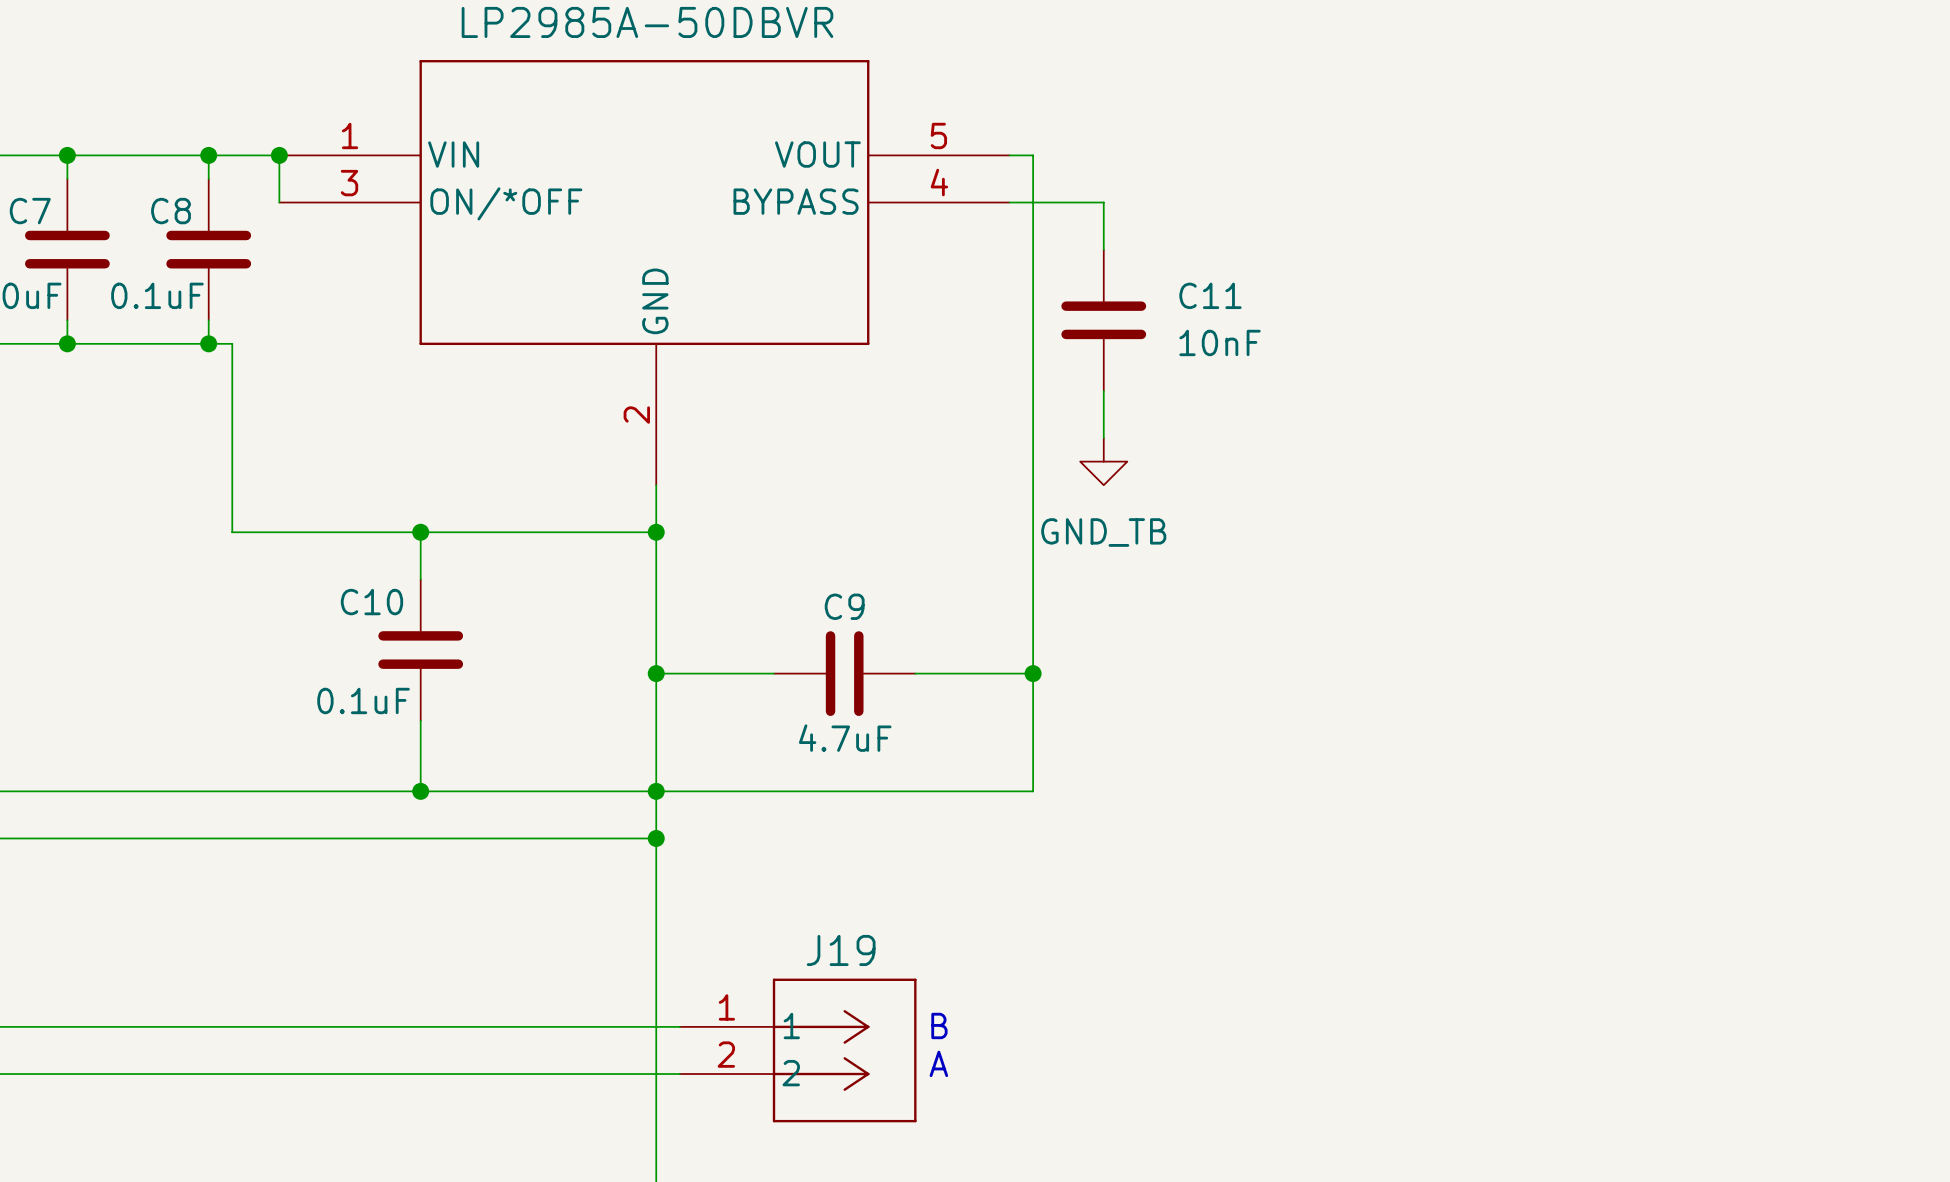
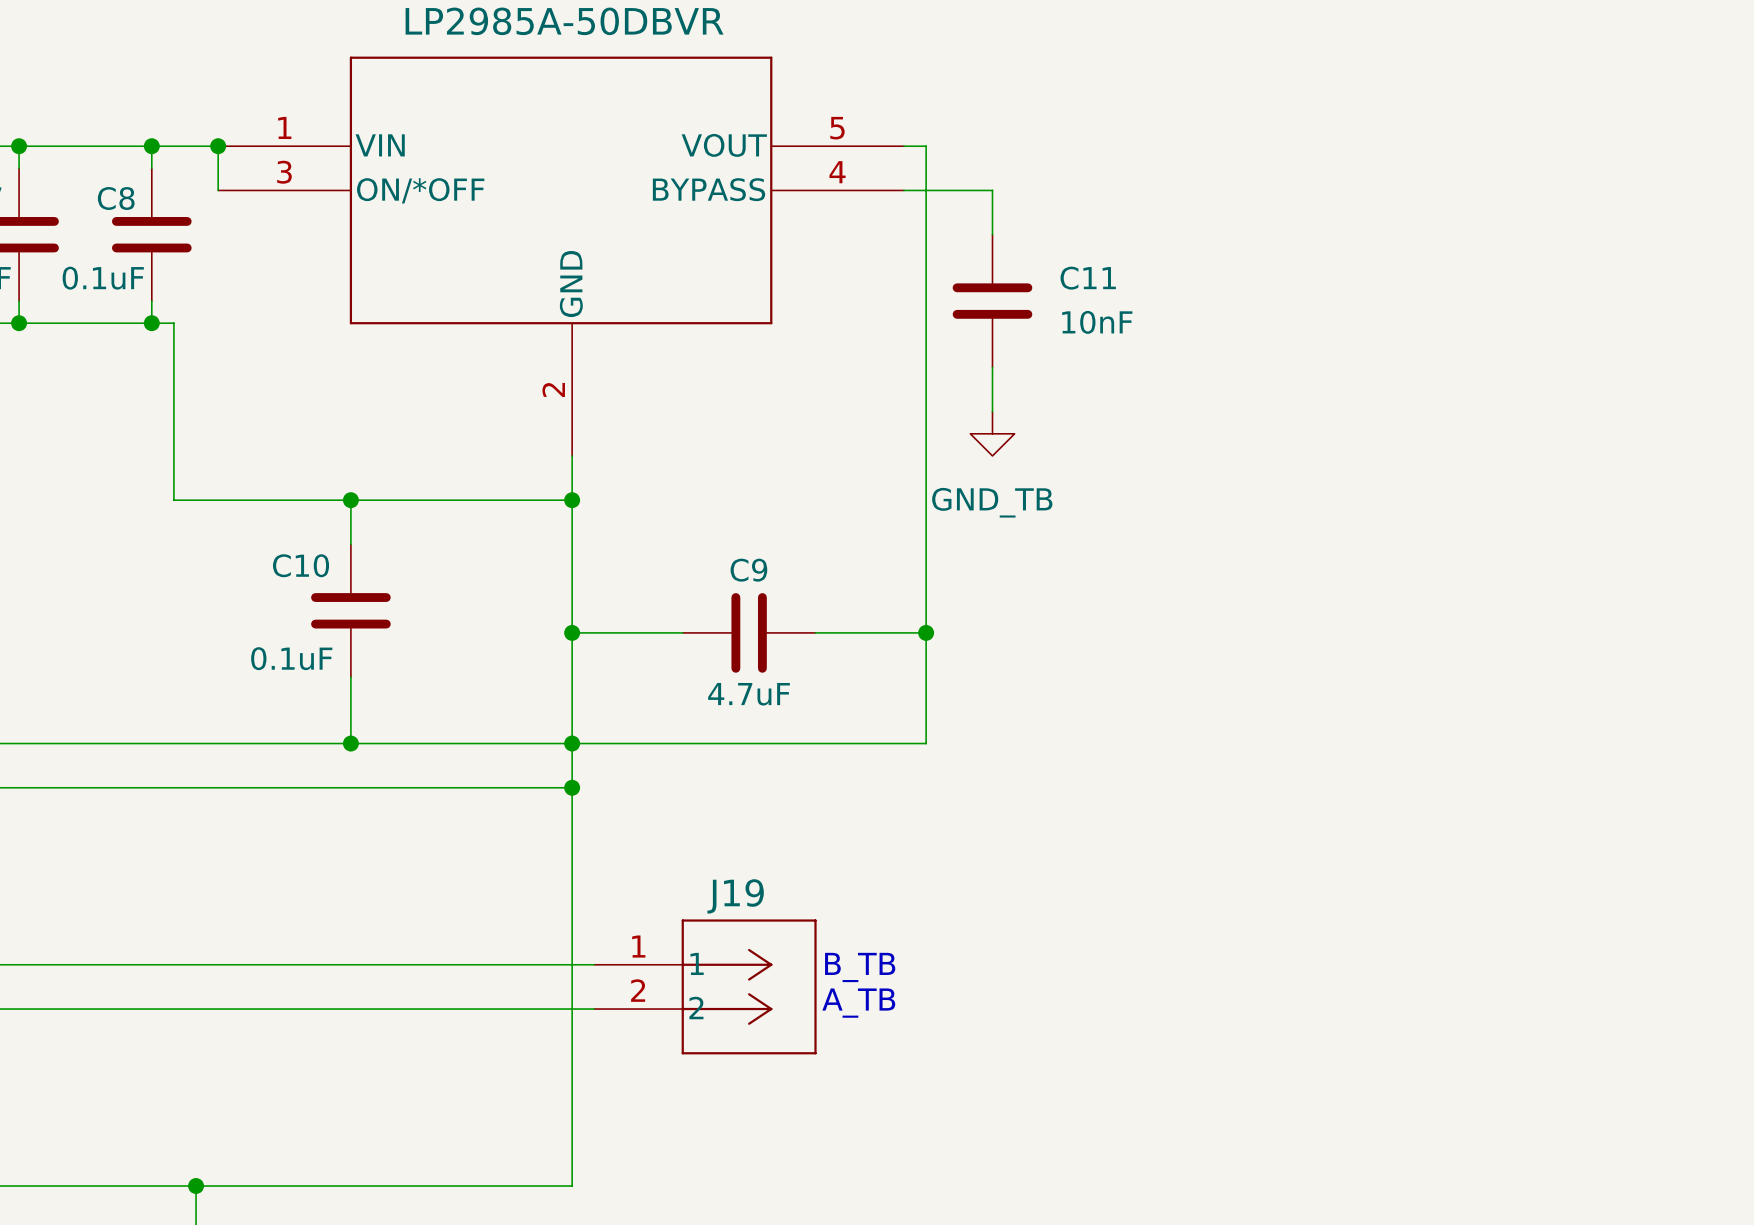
text: B (939, 1025) -> none
text: none -> B_TB (860, 967)
text: A (938, 1063) -> none
text: none -> A_TB (858, 1003)

